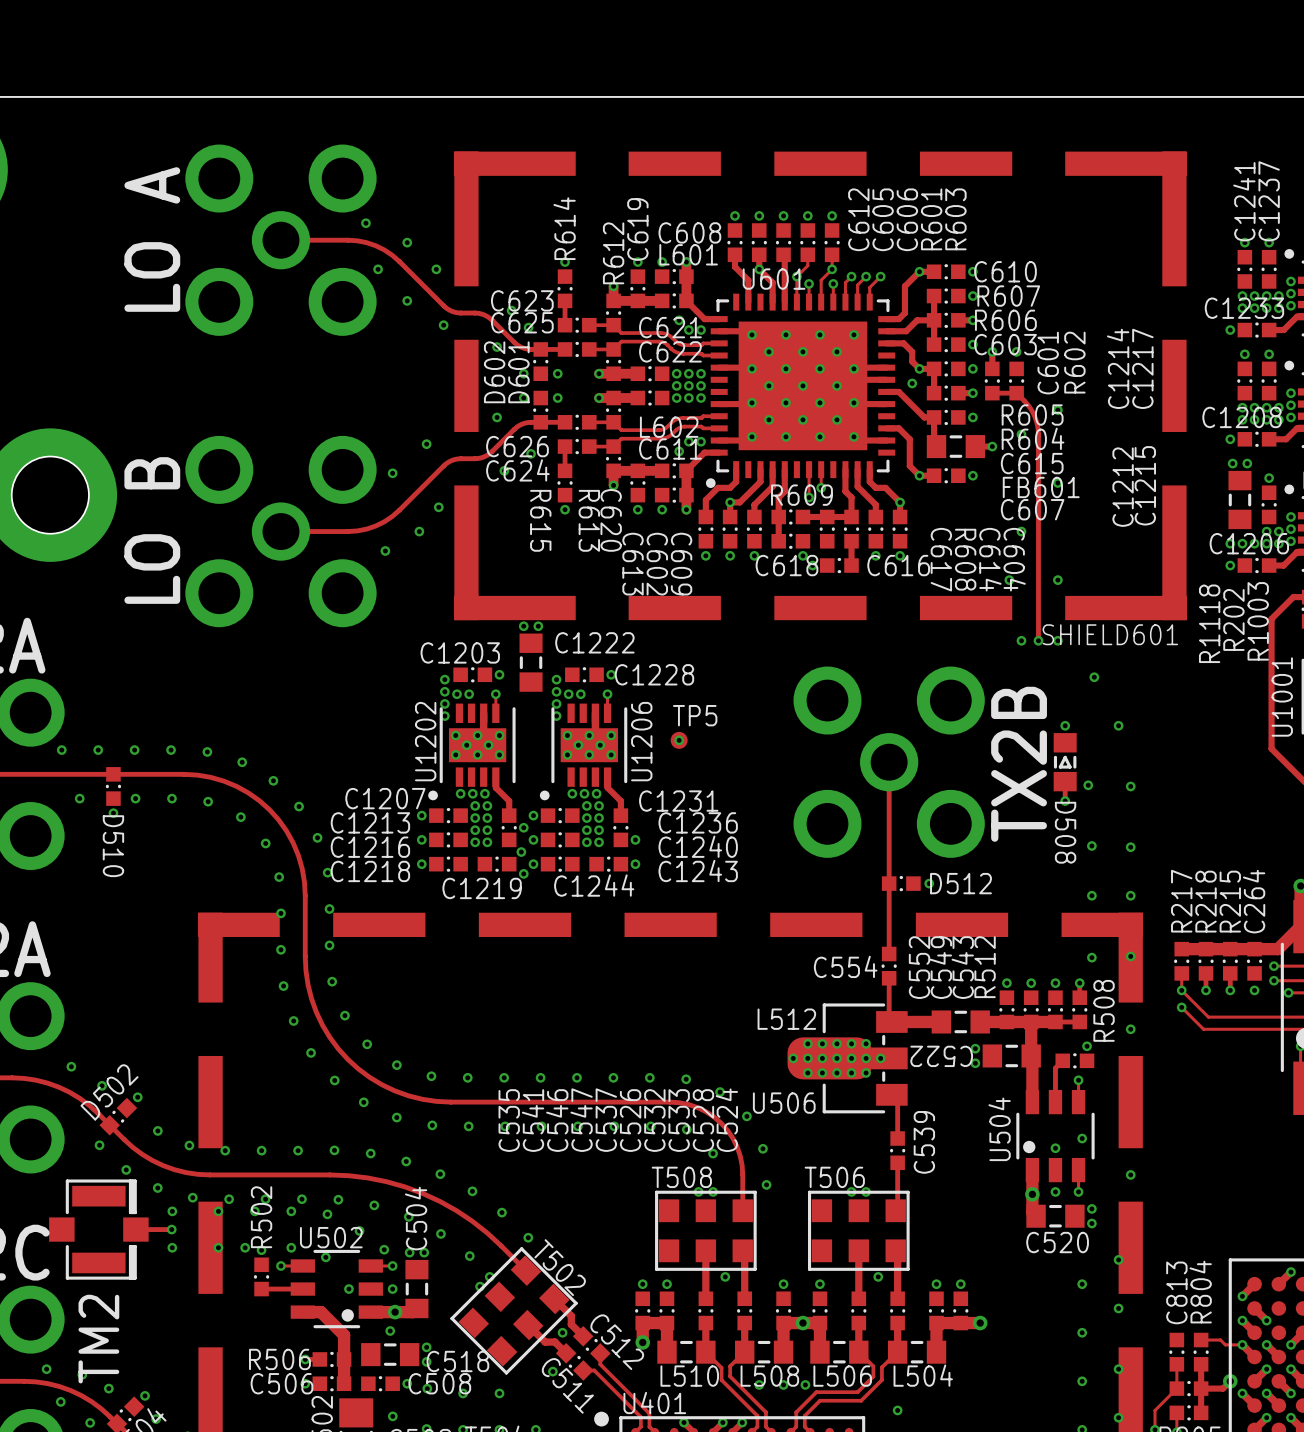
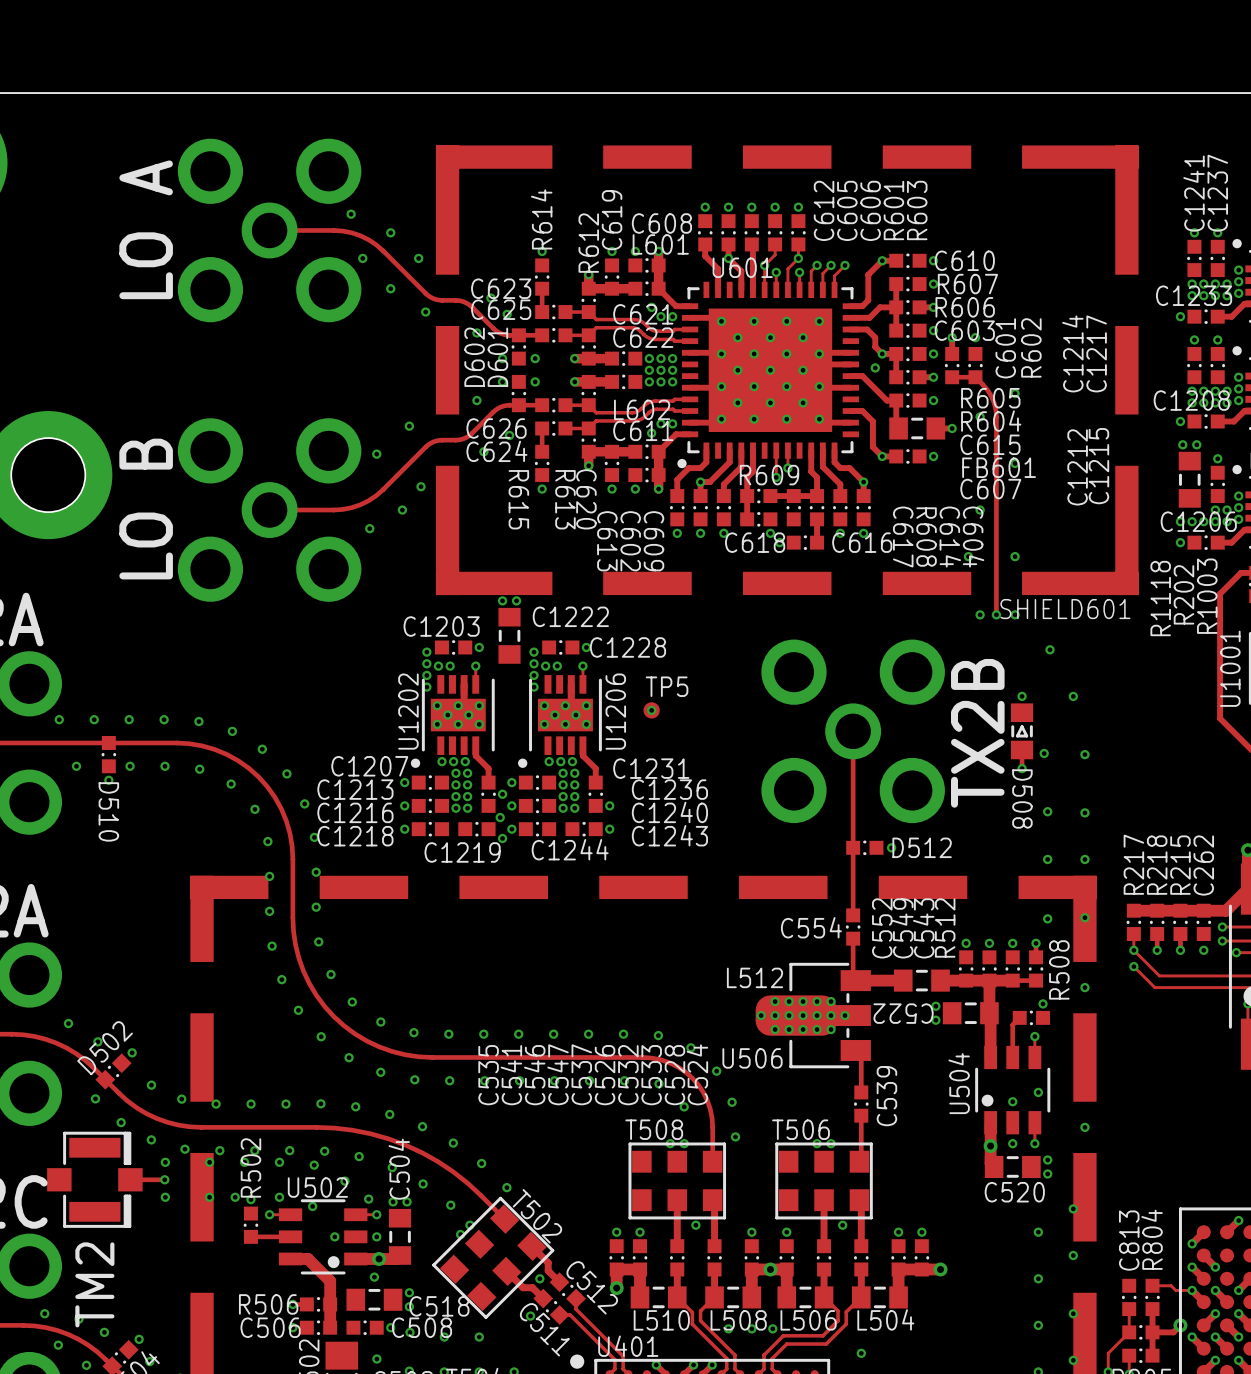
C264 name: C264 (1254, 901) -> C262 (1203, 865)

